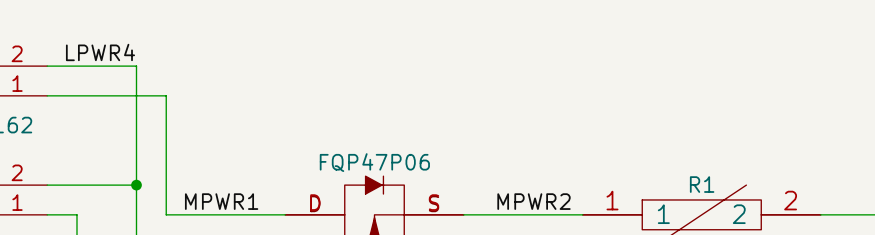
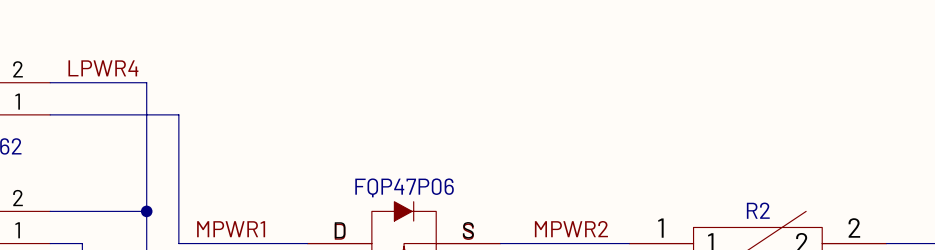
R1 name: R1 (702, 184) -> R2 (758, 210)

